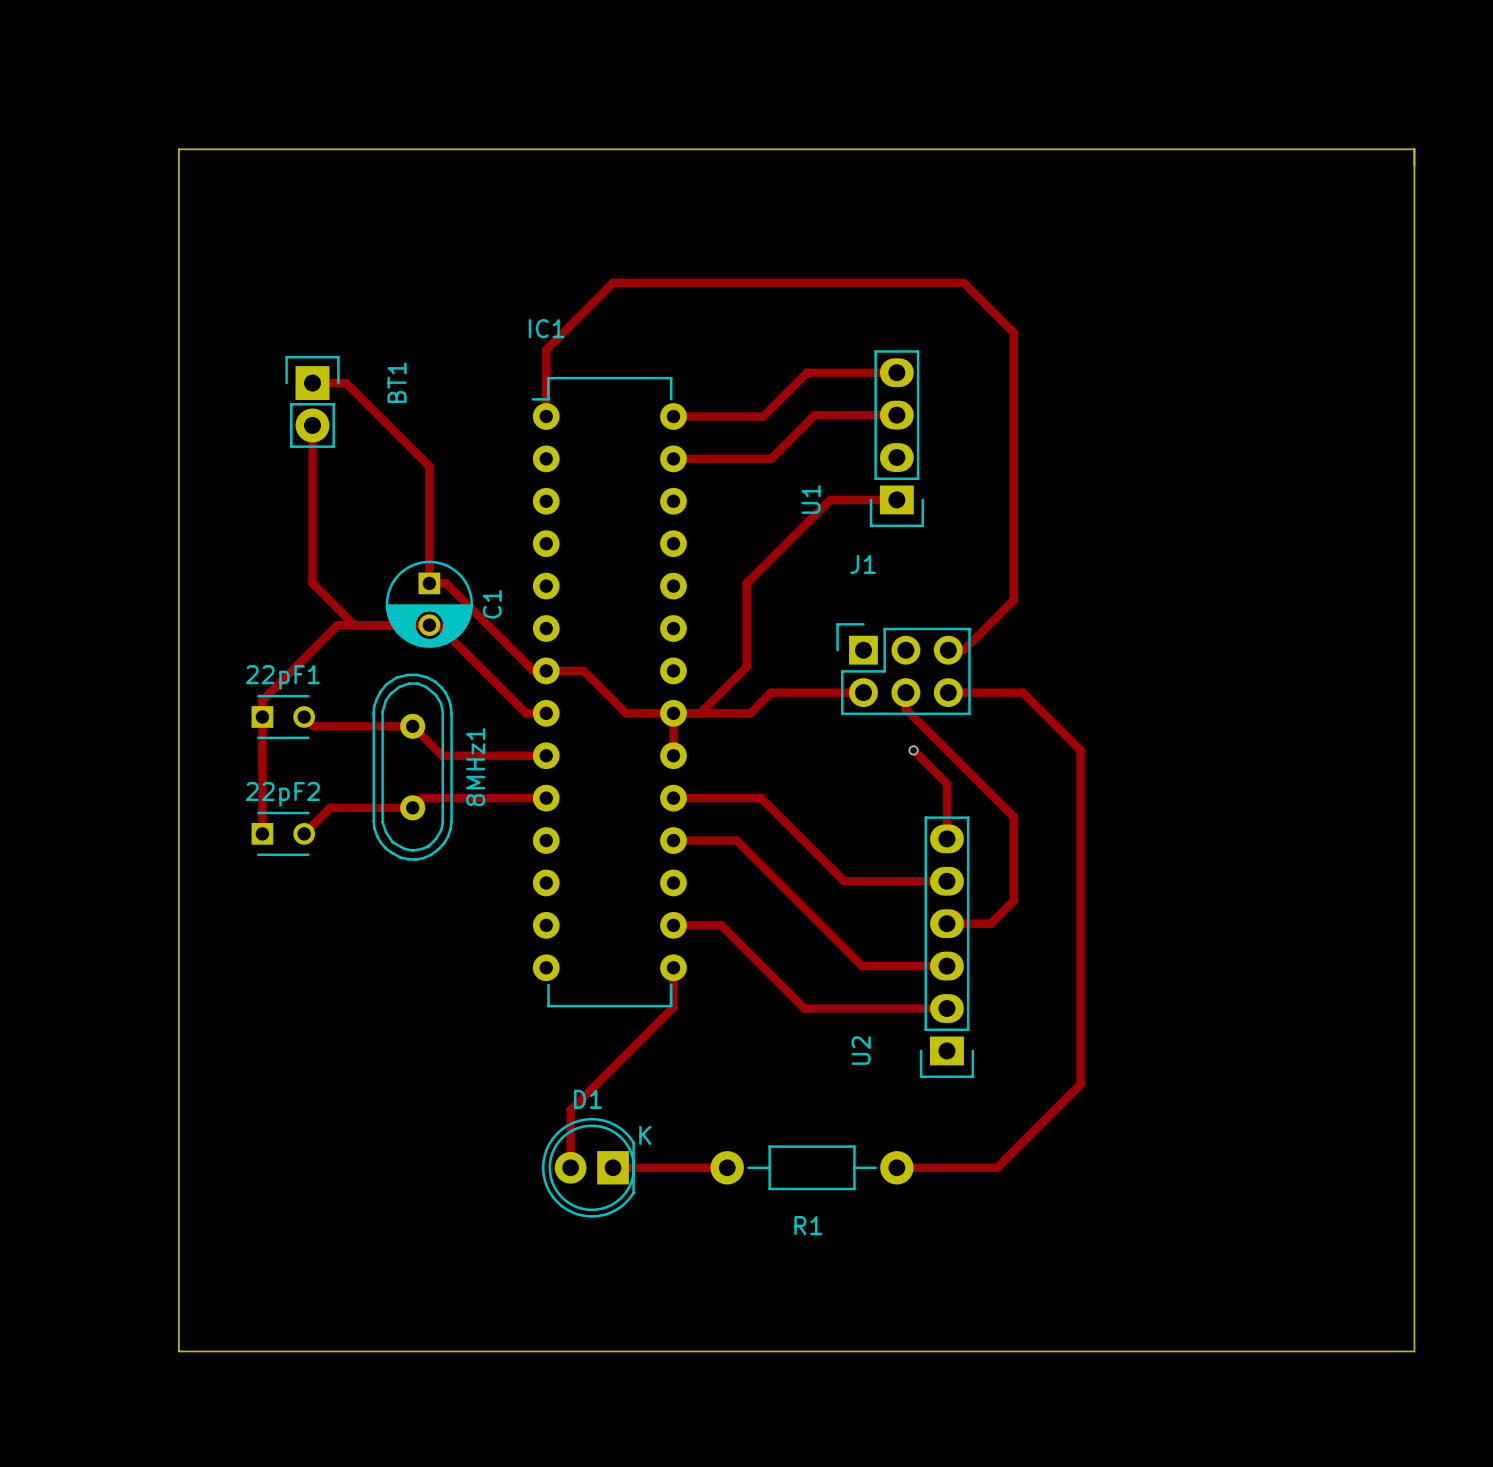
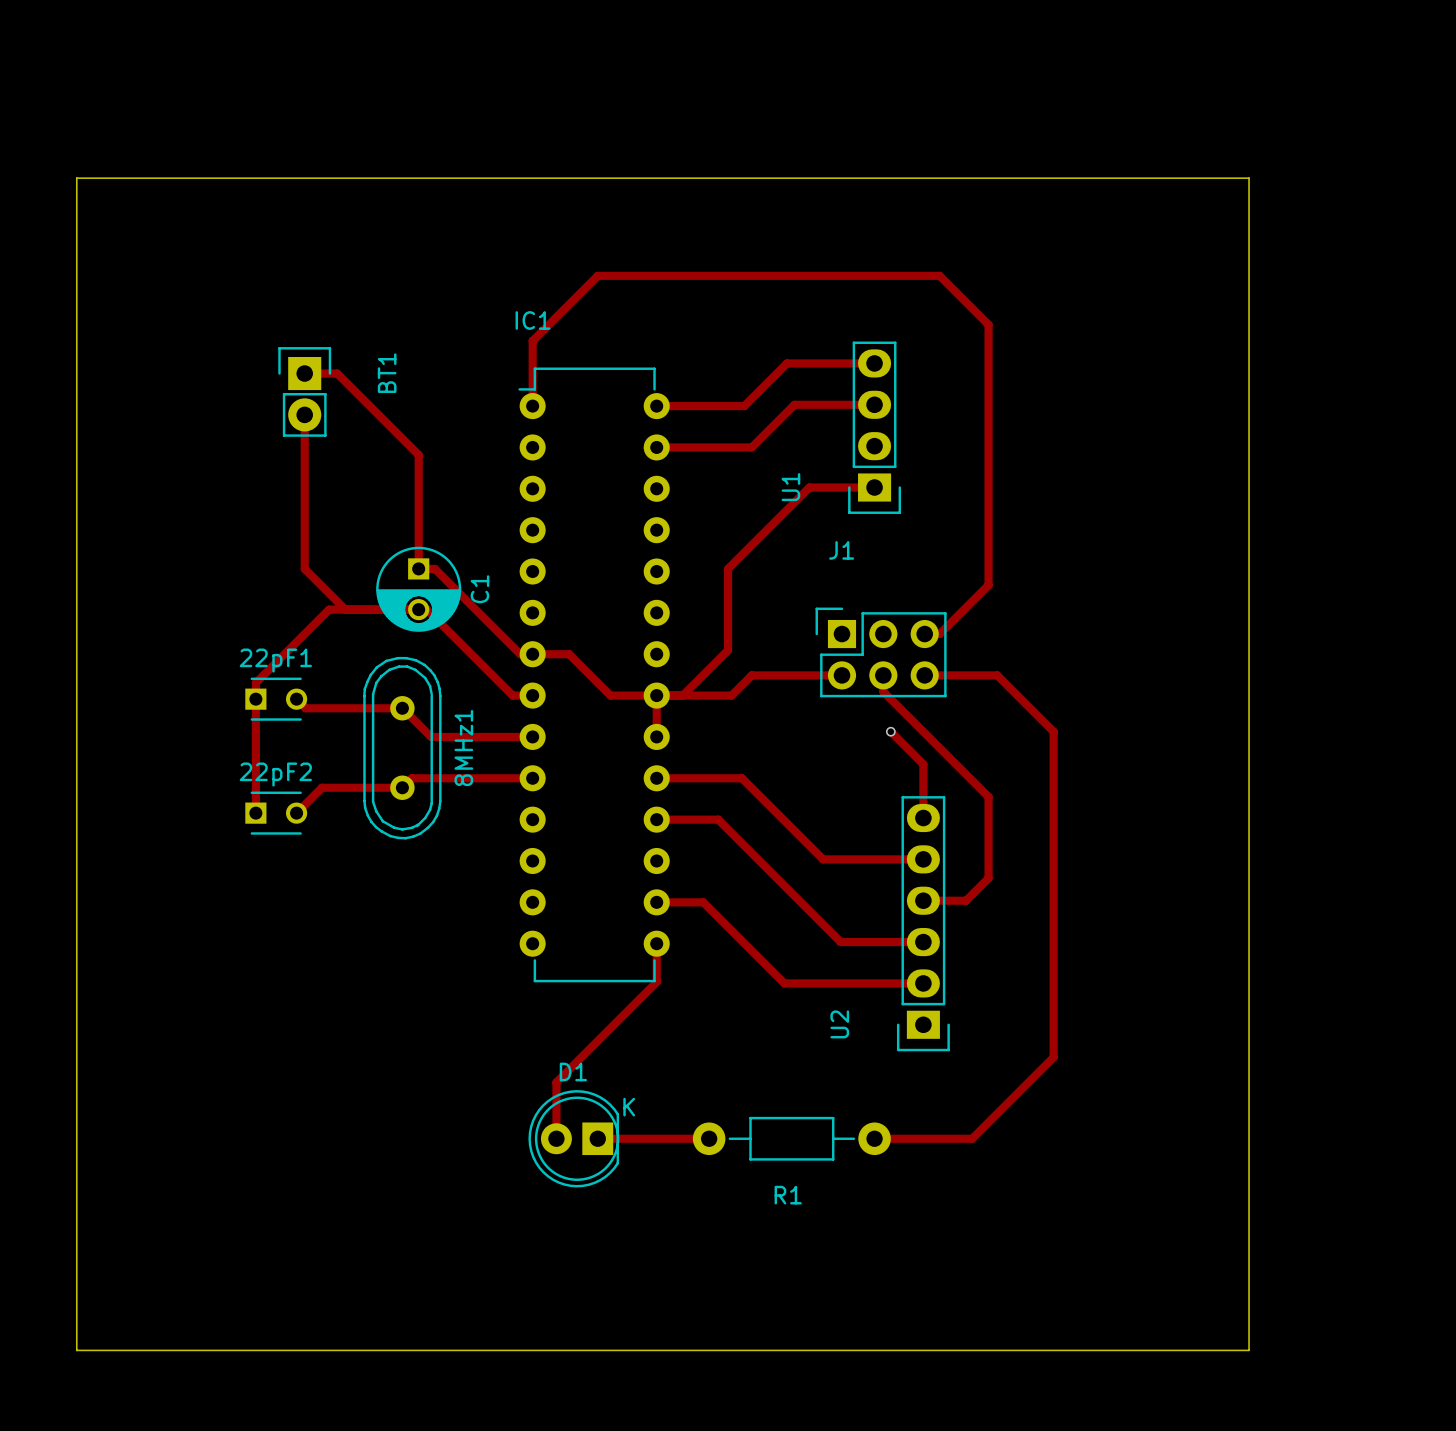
board edge: (178, 149) (1414, 149) (1414, 1351) (178, 1351) (178, 149) -> (76, 178) (76, 1350) (1249, 1350) (1249, 178) (76, 178)

